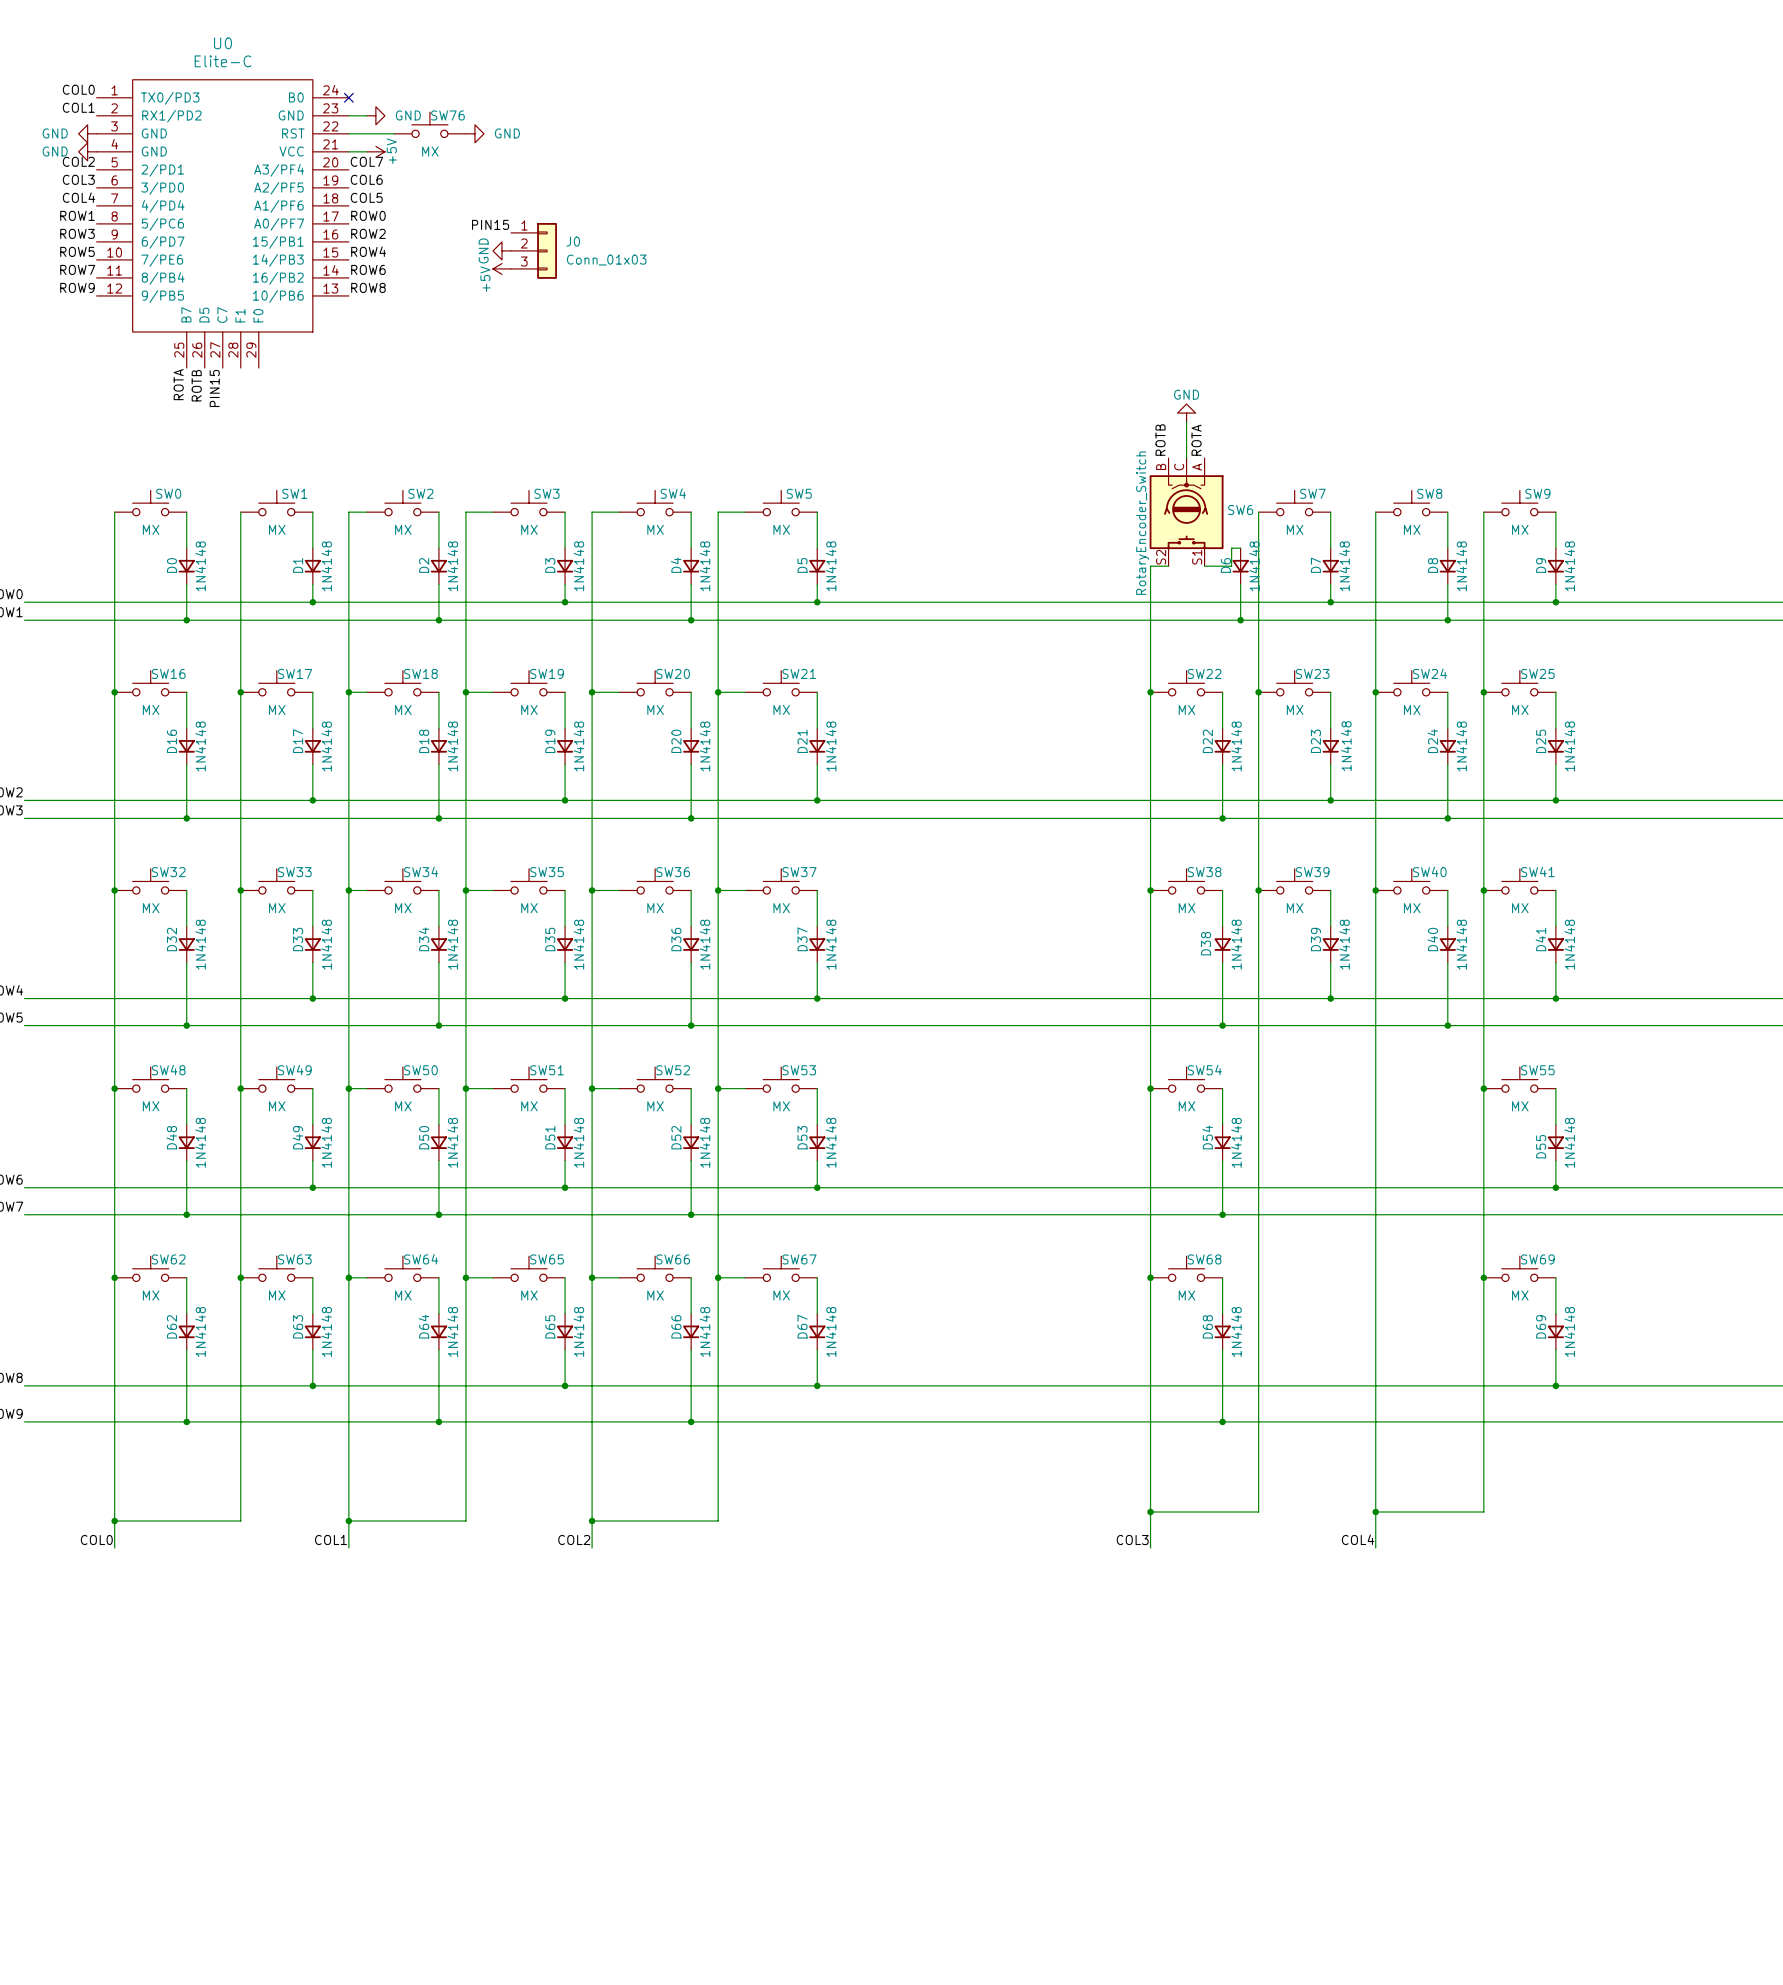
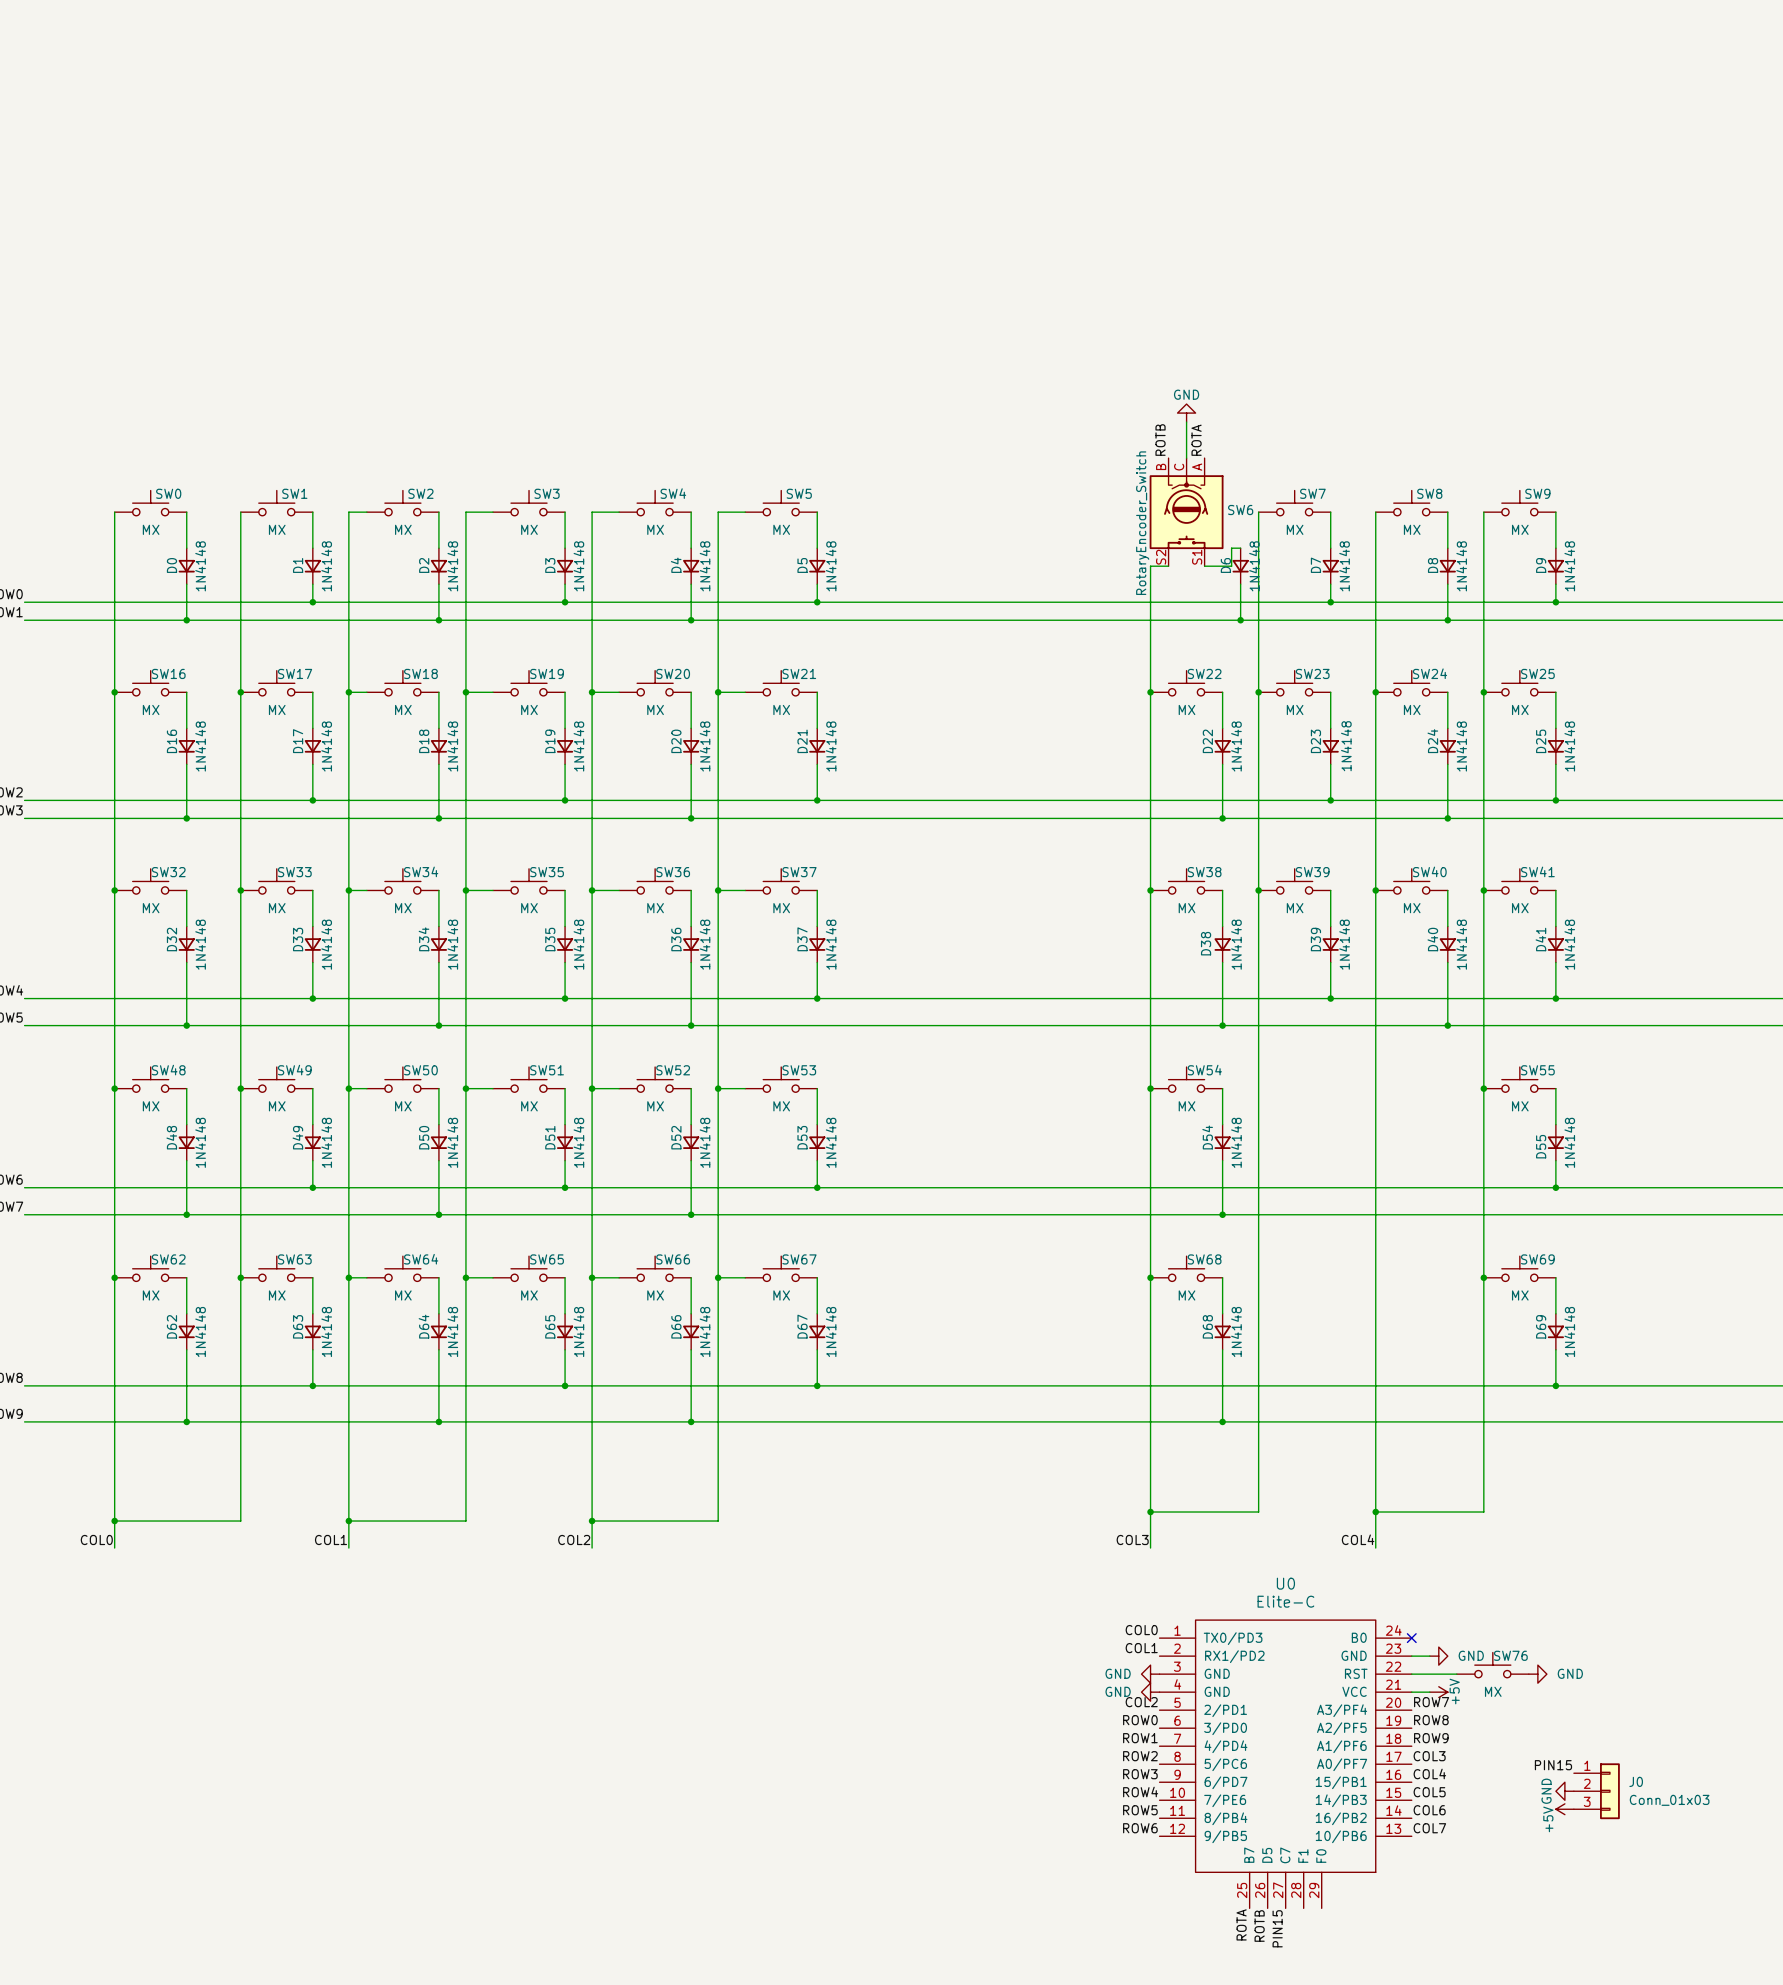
label: COL0 (78, 89) -> none
no-connect mark: (348, 97) -> none
label: COL1 (78, 107) -> none
wire: (348, 115) (366, 115) -> none
power symbol: GND (375, 115) -> none
SW76 position: (429, 124) -> (1492, 1665)
power symbol: GND (87, 133) -> none
wire: (348, 133) (393, 133) -> none
power symbol: GND (474, 133) -> none
power symbol: GND (87, 151) -> none
wire: (348, 151) (366, 151) -> none
power symbol: +5V (375, 151) -> none
label: COL2 (78, 161) -> none
label: COL7 (366, 161) -> none
label: COL3 (78, 179) -> none
label: COL6 (366, 179) -> none
label: COL4 (78, 197) -> none
label: COL5 (366, 197) -> none
label: ROW1 (77, 215) -> none
label: ROW0 (368, 215) -> none
U0 position: (222, 223) -> (1285, 1764)
label: PIN15 (490, 224) -> none
label: ROW3 (77, 233) -> none
label: ROW2 (368, 233) -> none
power symbol: GND (501, 250) -> none
J0 position: (533, 250) -> (1596, 1791)
label: ROW5 (77, 251) -> none
label: ROW4 (368, 251) -> none
power symbol: +5V (501, 268) -> none
label: ROW7 (77, 269) -> none
label: ROW6 (368, 269) -> none
label: ROW9 (77, 287) -> none
label: ROW8 (368, 287) -> none
label: ROTA (178, 384) -> none
label: ROTB (196, 385) -> none
label: PIN15 (214, 388) -> none
label: none -> COL0 (1141, 1630)
no-connect mark: none -> (1411, 1638)
label: none -> COL1 (1141, 1648)
wire: none -> (1411, 1656) (1429, 1656)
power symbol: none -> GND (1438, 1656)
power symbol: none -> GND (1150, 1674)
wire: none -> (1411, 1674) (1456, 1674)
power symbol: none -> GND (1537, 1674)
power symbol: none -> GND (1150, 1692)
wire: none -> (1411, 1692) (1429, 1692)
power symbol: none -> +5V (1438, 1692)
label: none -> COL2 (1141, 1702)
label: none -> ROW7 (1431, 1702)
label: none -> ROW0 (1140, 1720)
label: none -> ROW8 (1431, 1720)
label: none -> ROW1 (1140, 1738)
label: none -> ROW9 (1431, 1738)
label: none -> ROW2 (1140, 1756)
label: none -> COL3 (1429, 1756)
label: none -> PIN15 (1553, 1765)
label: none -> COL4 (1429, 1773)
label: none -> ROW3 (1140, 1774)
label: none -> ROW4 (1140, 1791)
power symbol: none -> GND (1564, 1791)
label: none -> COL5 (1429, 1792)
power symbol: none -> +5V (1564, 1809)
label: none -> ROW5 (1140, 1810)
label: none -> COL6 (1429, 1810)
label: none -> ROW6 (1140, 1828)
label: none -> COL7 (1429, 1828)
label: none -> ROTA (1241, 1924)
label: none -> ROTB (1259, 1925)
label: none -> PIN15 (1277, 1928)

